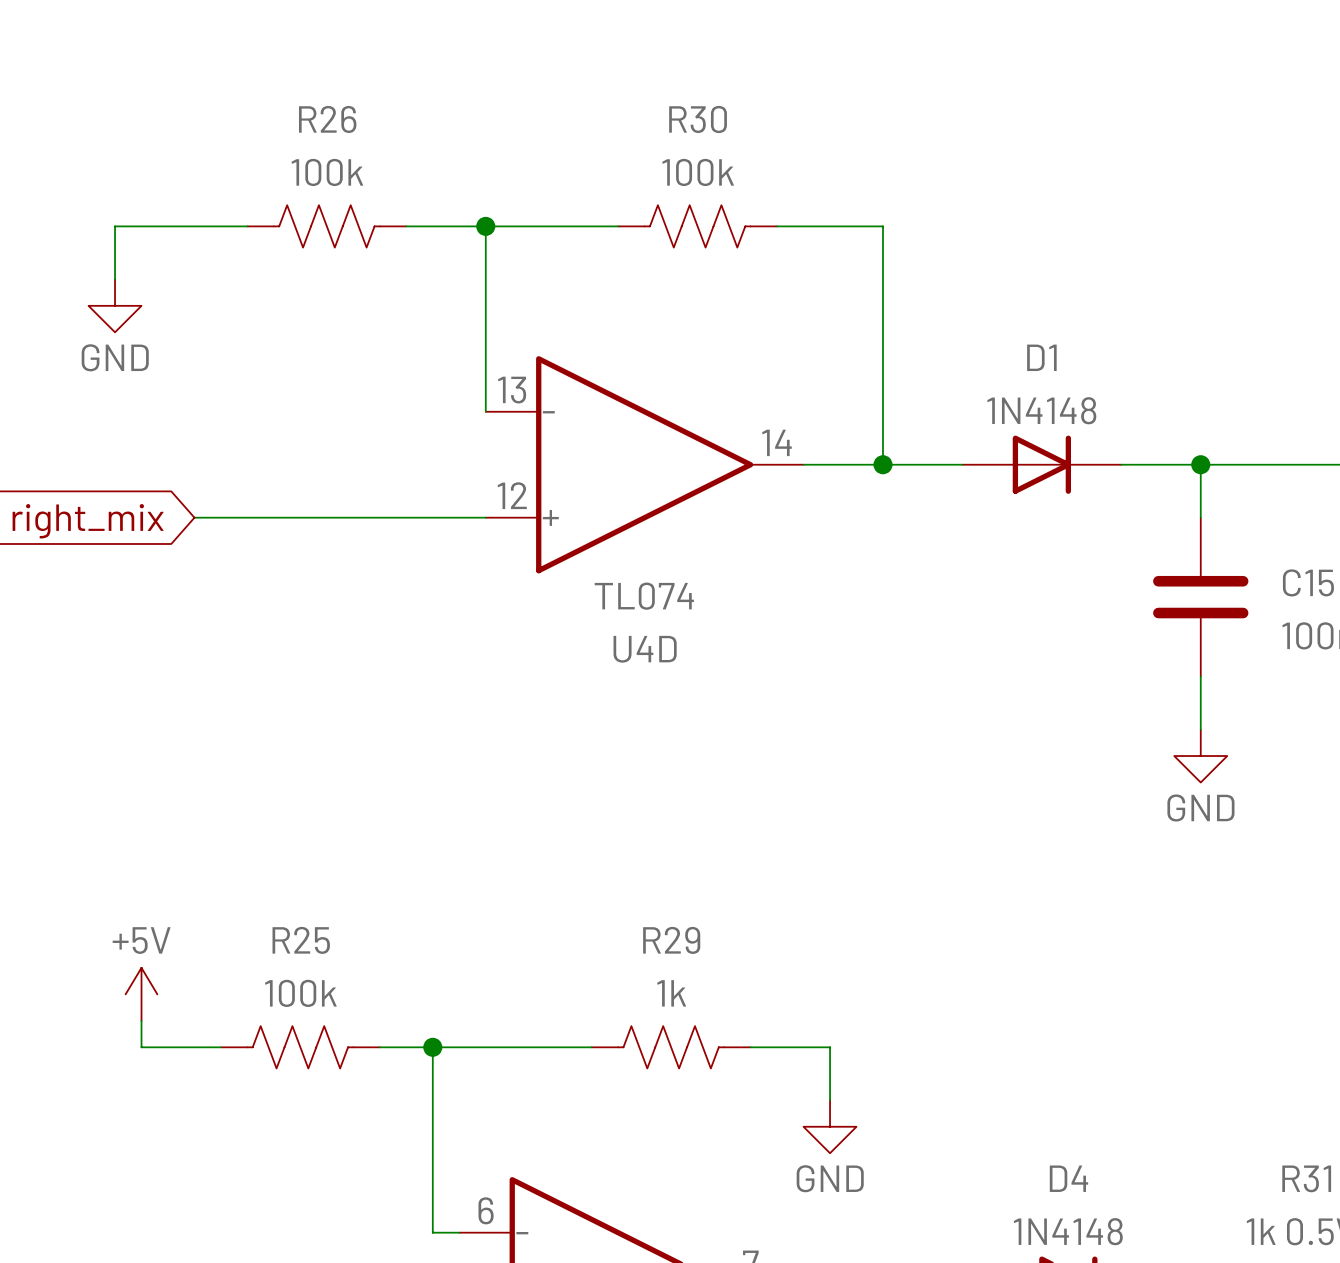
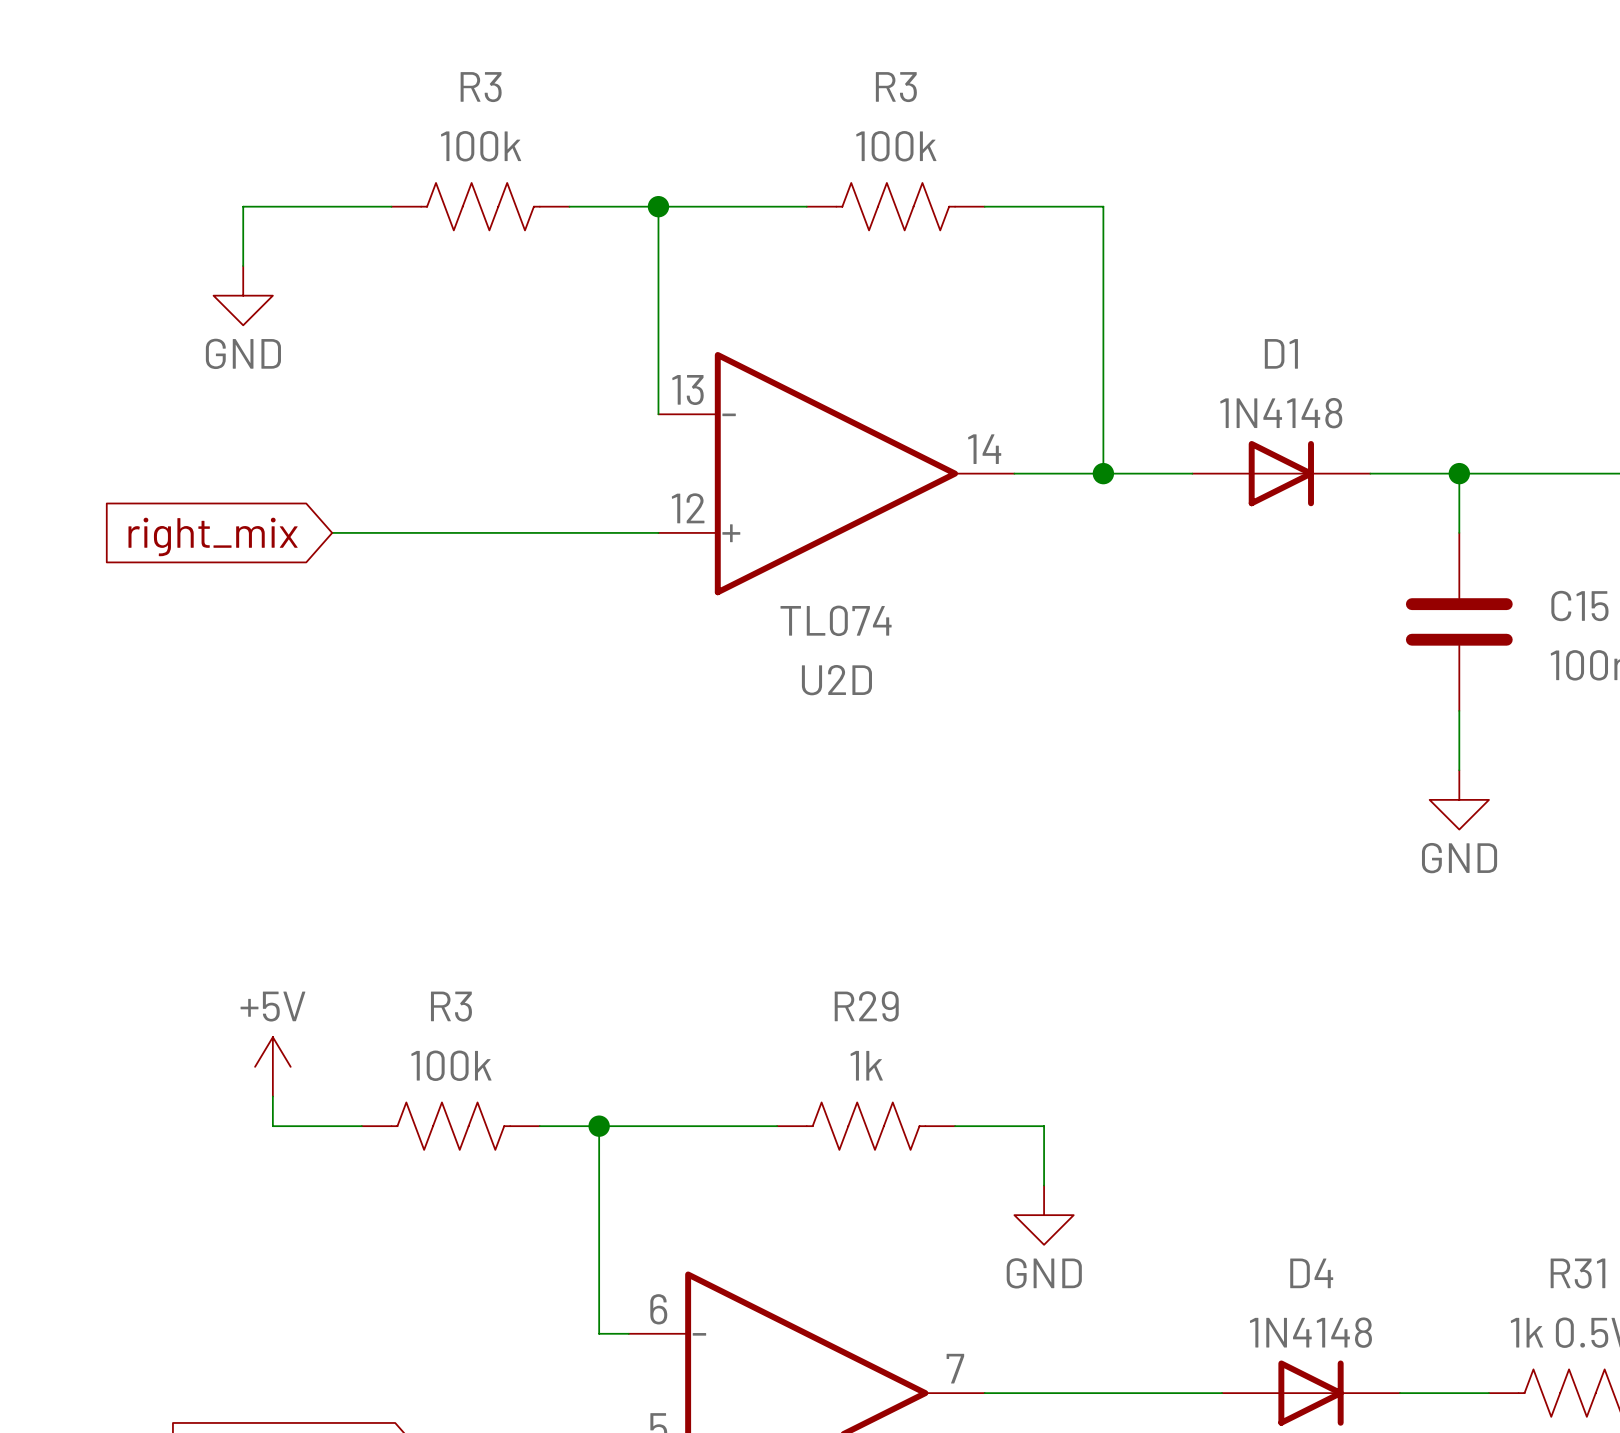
R26 name: R26 (327, 119) -> R3 (481, 87)
R30 name: R30 (698, 119) -> R3 (896, 87)
U4D name: U4D (645, 649) -> U2D (836, 680)
R25 name: R25 (301, 940) -> R3 (451, 1006)

